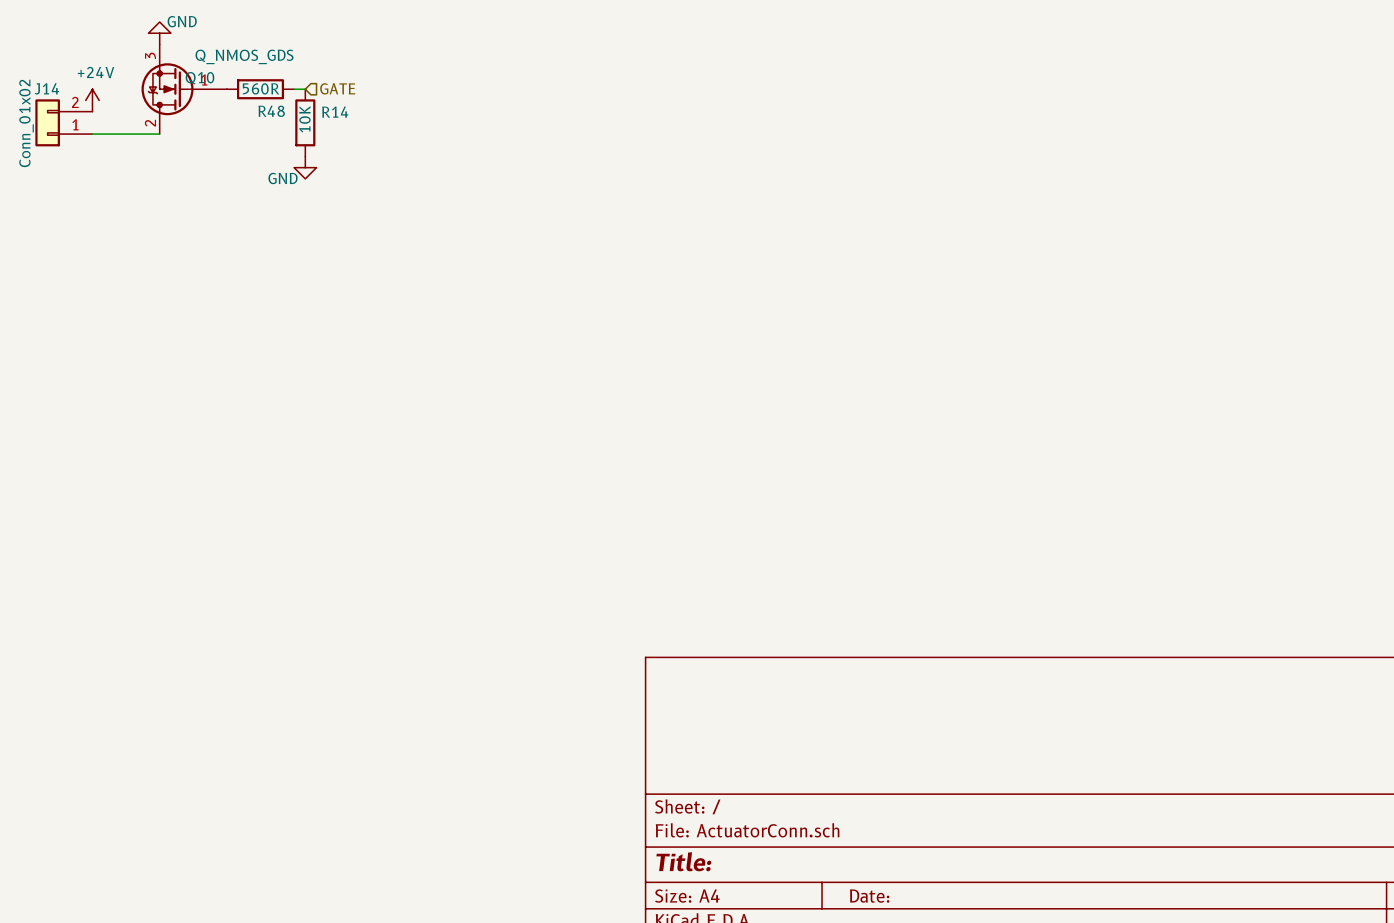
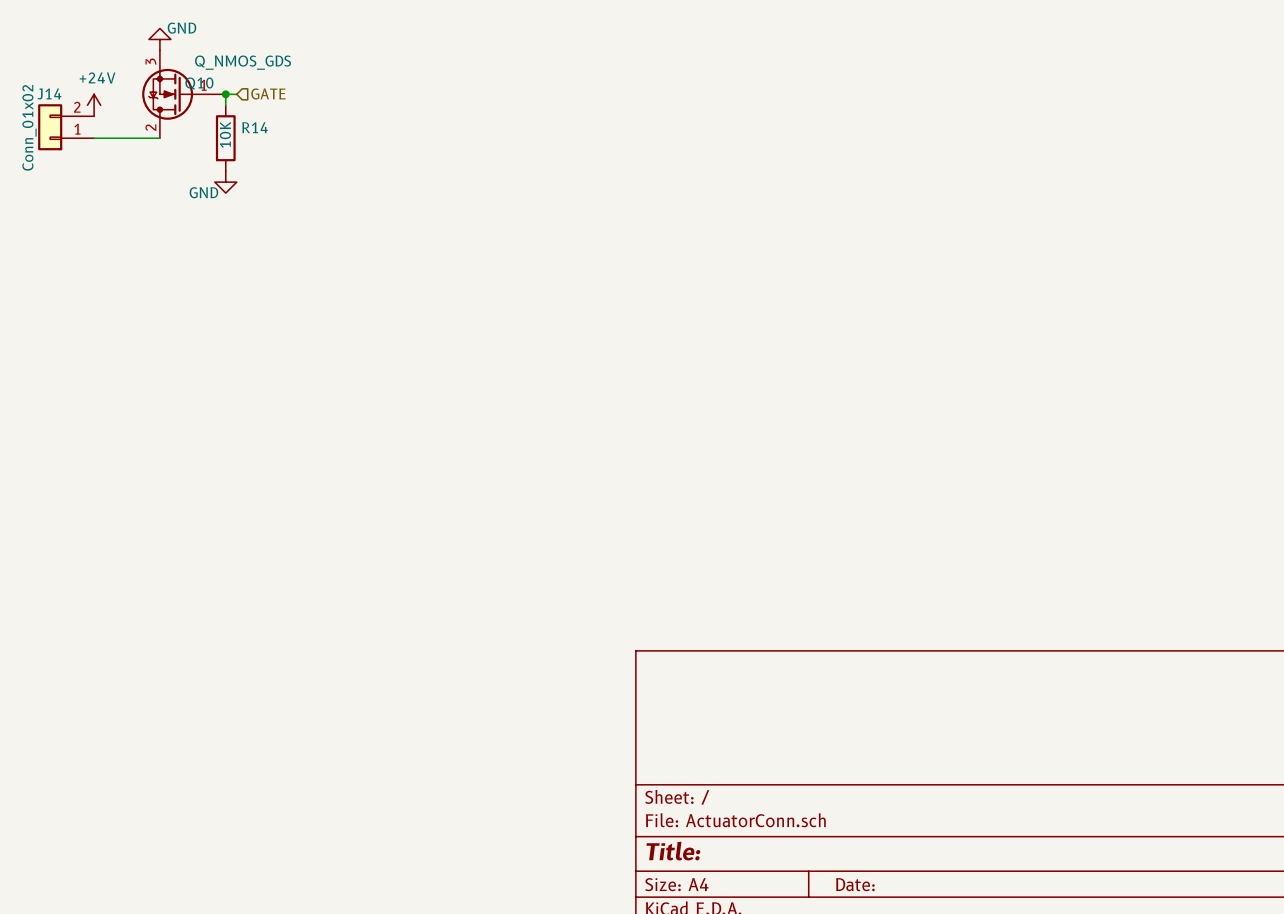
hierarchical label position: GATE (337, 88) -> GATE (268, 93)
junction: none -> (225, 94)
R48: 560R (260, 89) -> none
wire: (294, 89) (305, 89) -> none
R14 position: (305, 122) -> (225, 138)
power symbol position: GND (305, 167) -> GND (225, 182)

